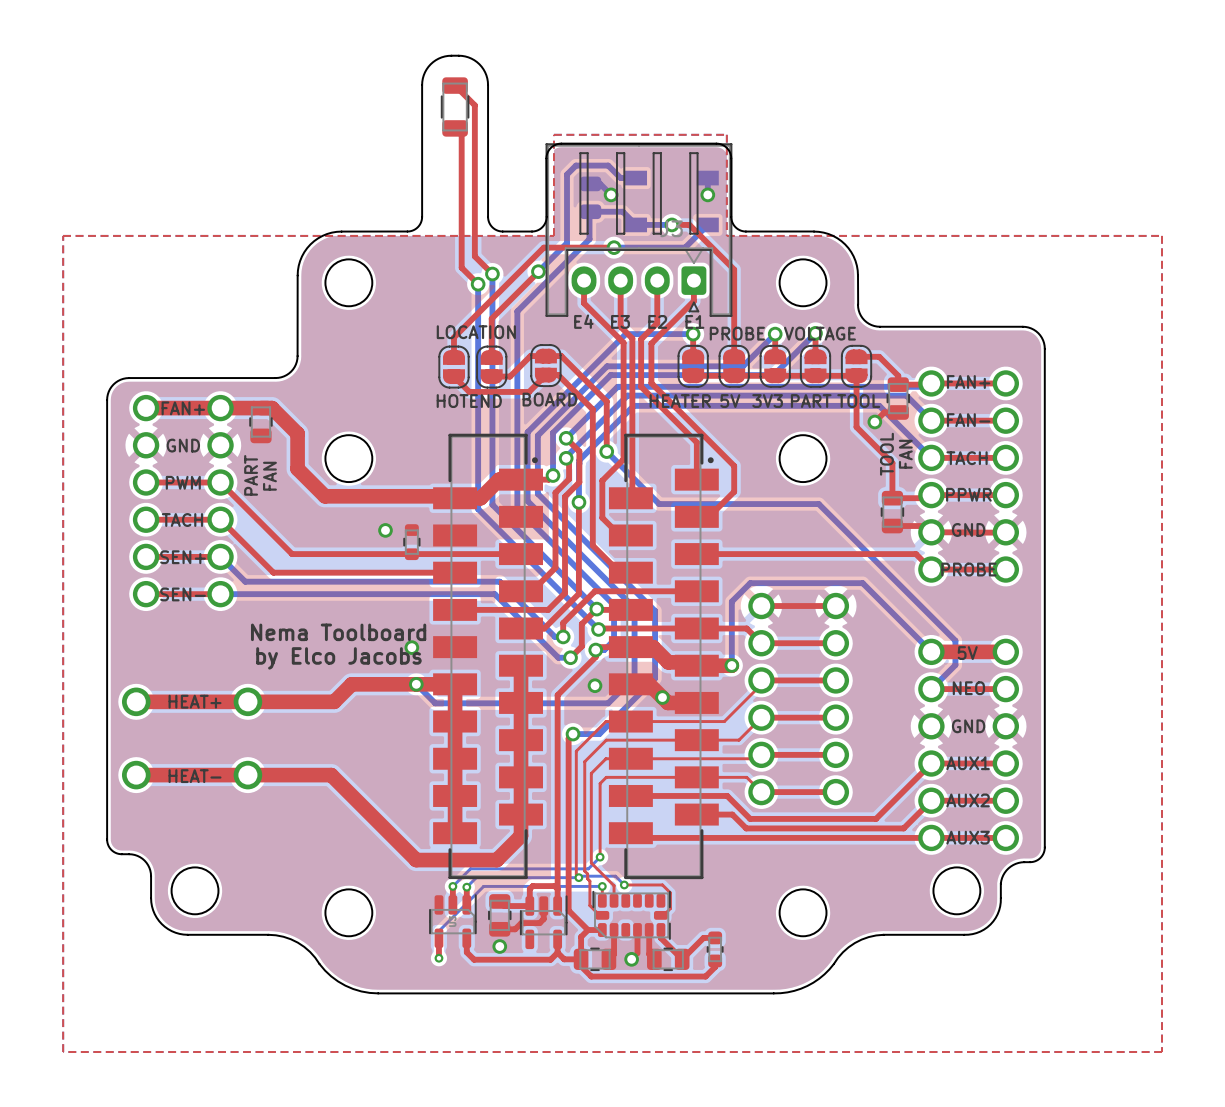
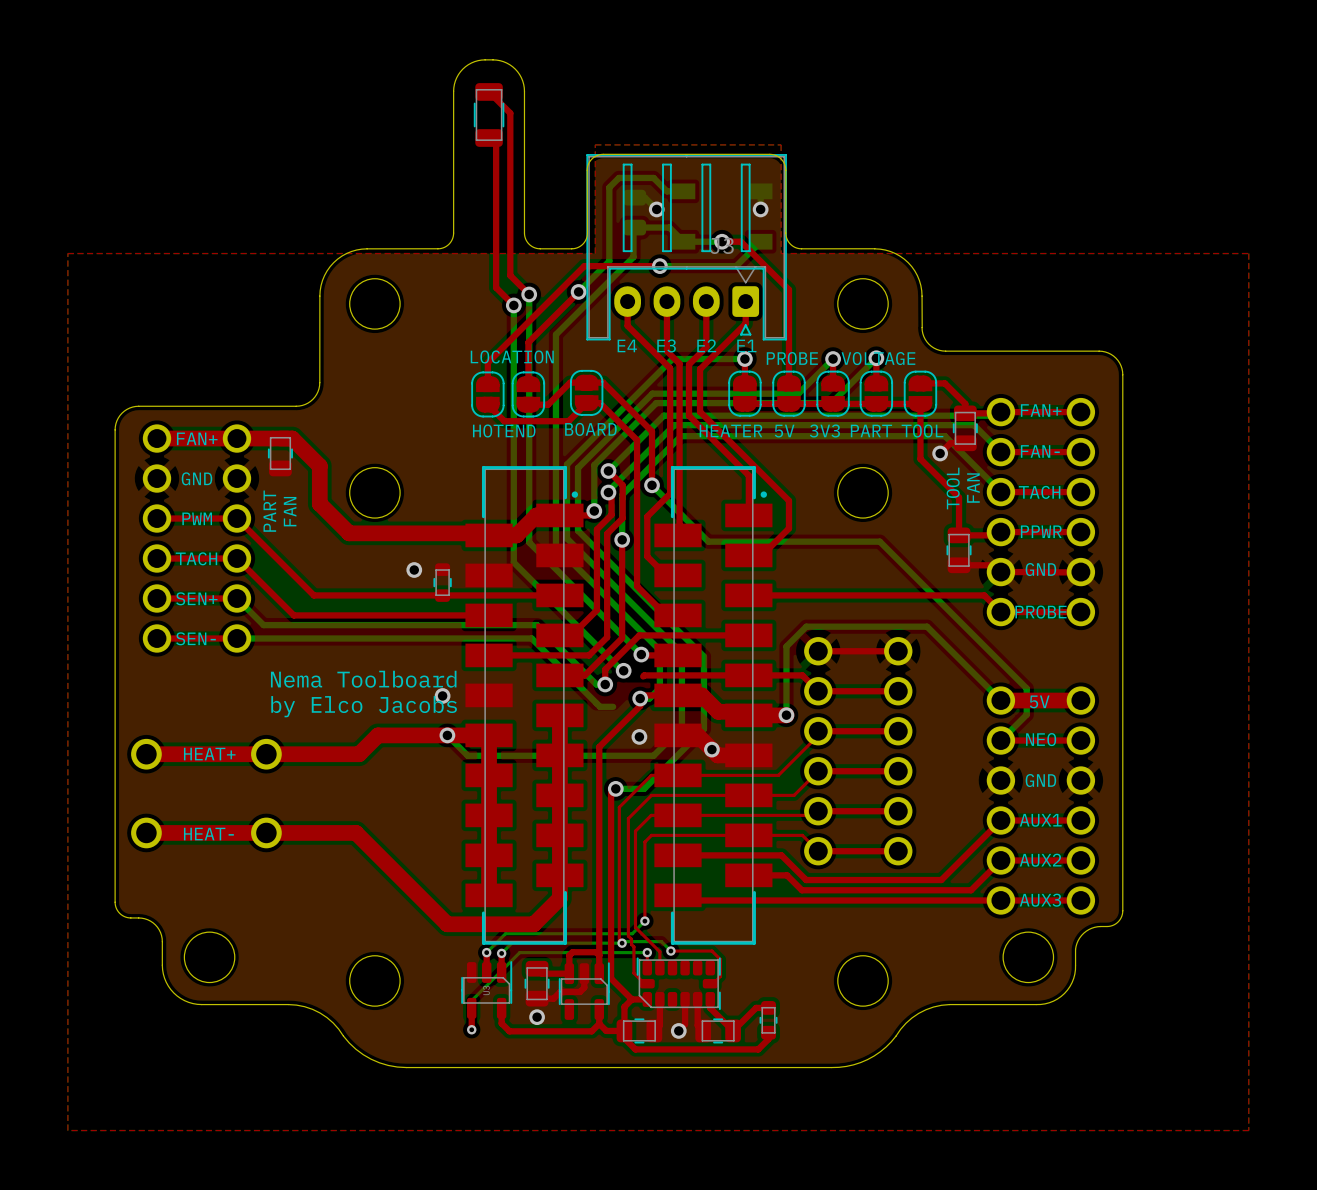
bottom track: (478, 509) (598, 629) -> (513, 547) (513, 562) (623, 670)
top track: (596, 609) (581, 624) (581, 646) (570, 657) -> none
via: none -> (623, 670)
via: (598, 629) -> none
via: (570, 657) -> none

